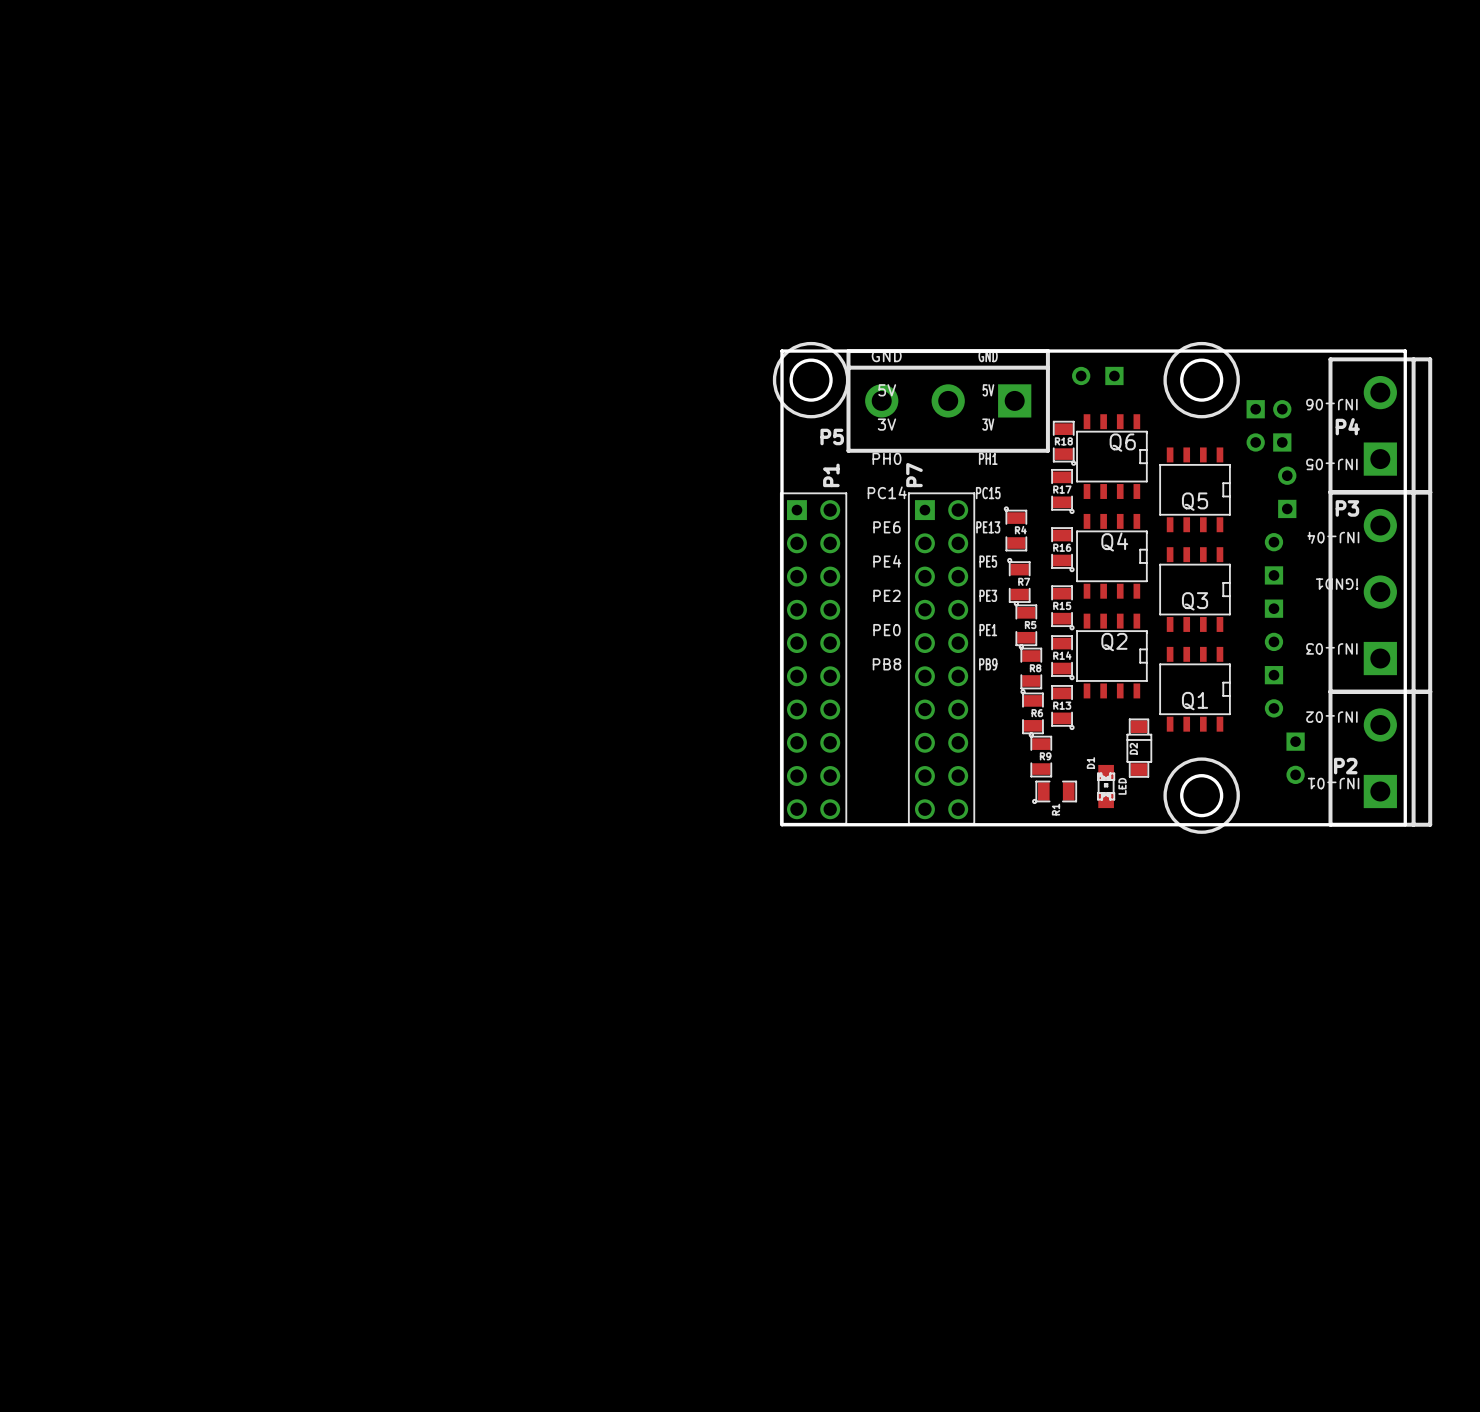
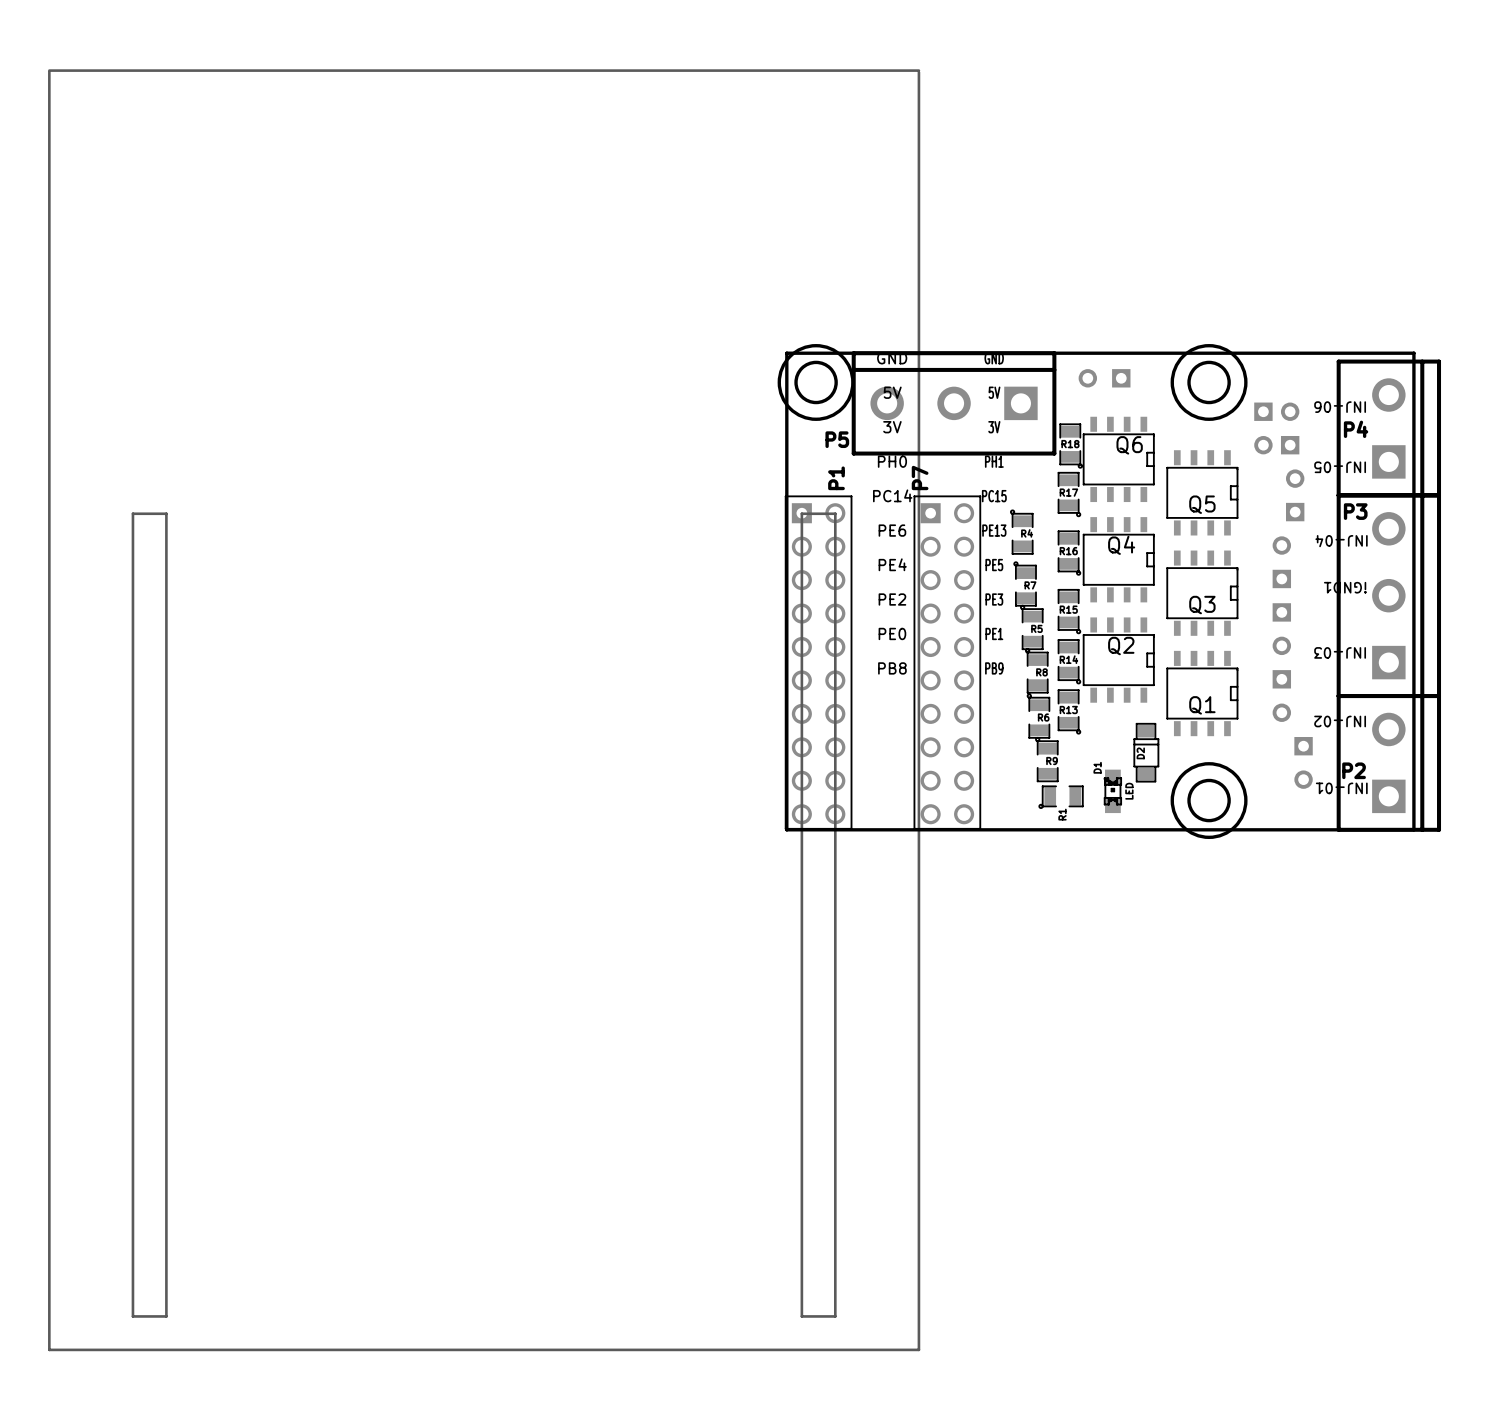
line: none -> (49, 70) (918, 70)
line: none -> (49, 72) (49, 1349) (918, 1349) (918, 72)
line: none -> (132, 513) (166, 513) (166, 1316) (132, 1316) (132, 513)
line: none -> (801, 513) (835, 513) (835, 1316) (801, 1316) (801, 513)

